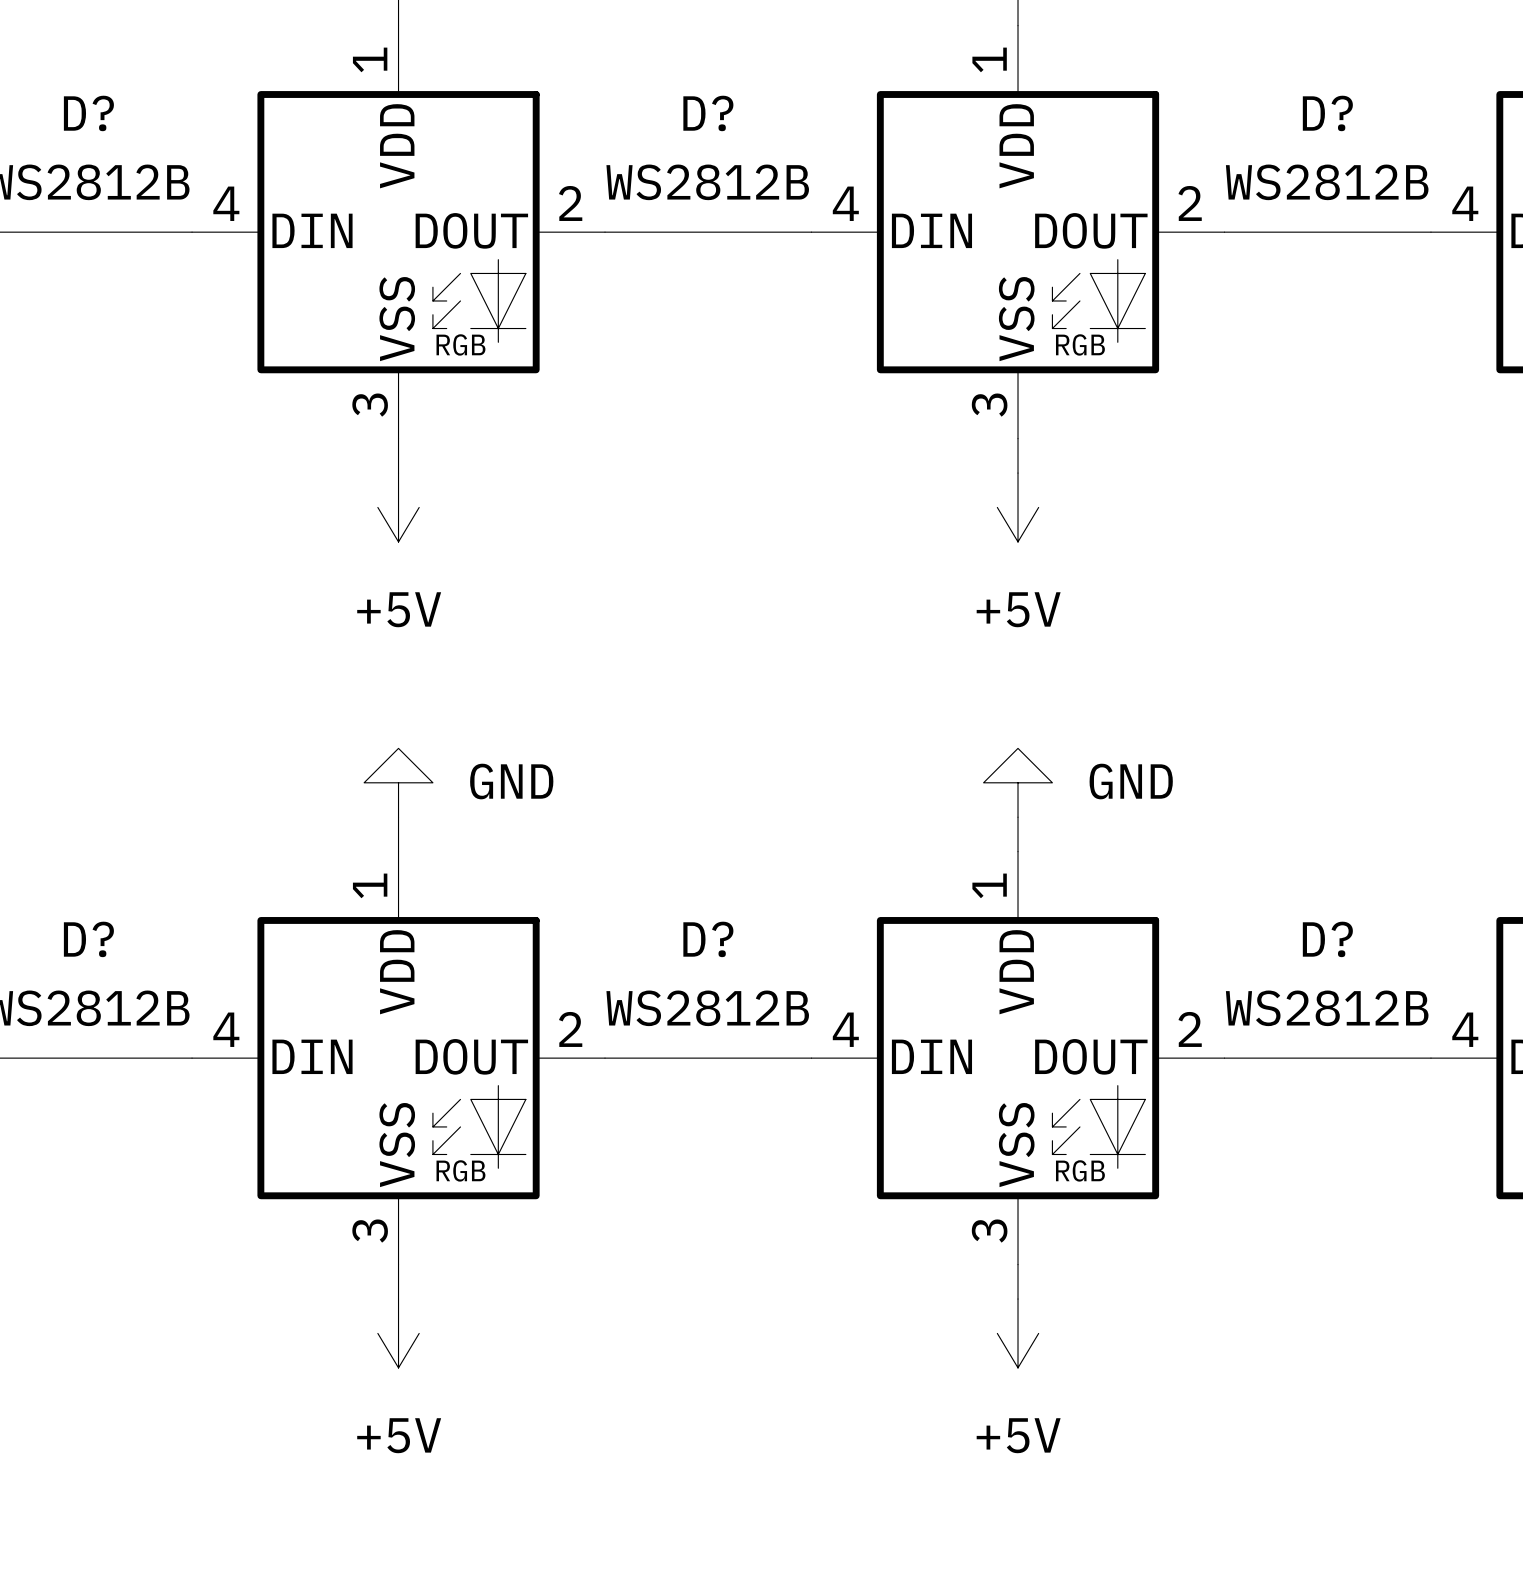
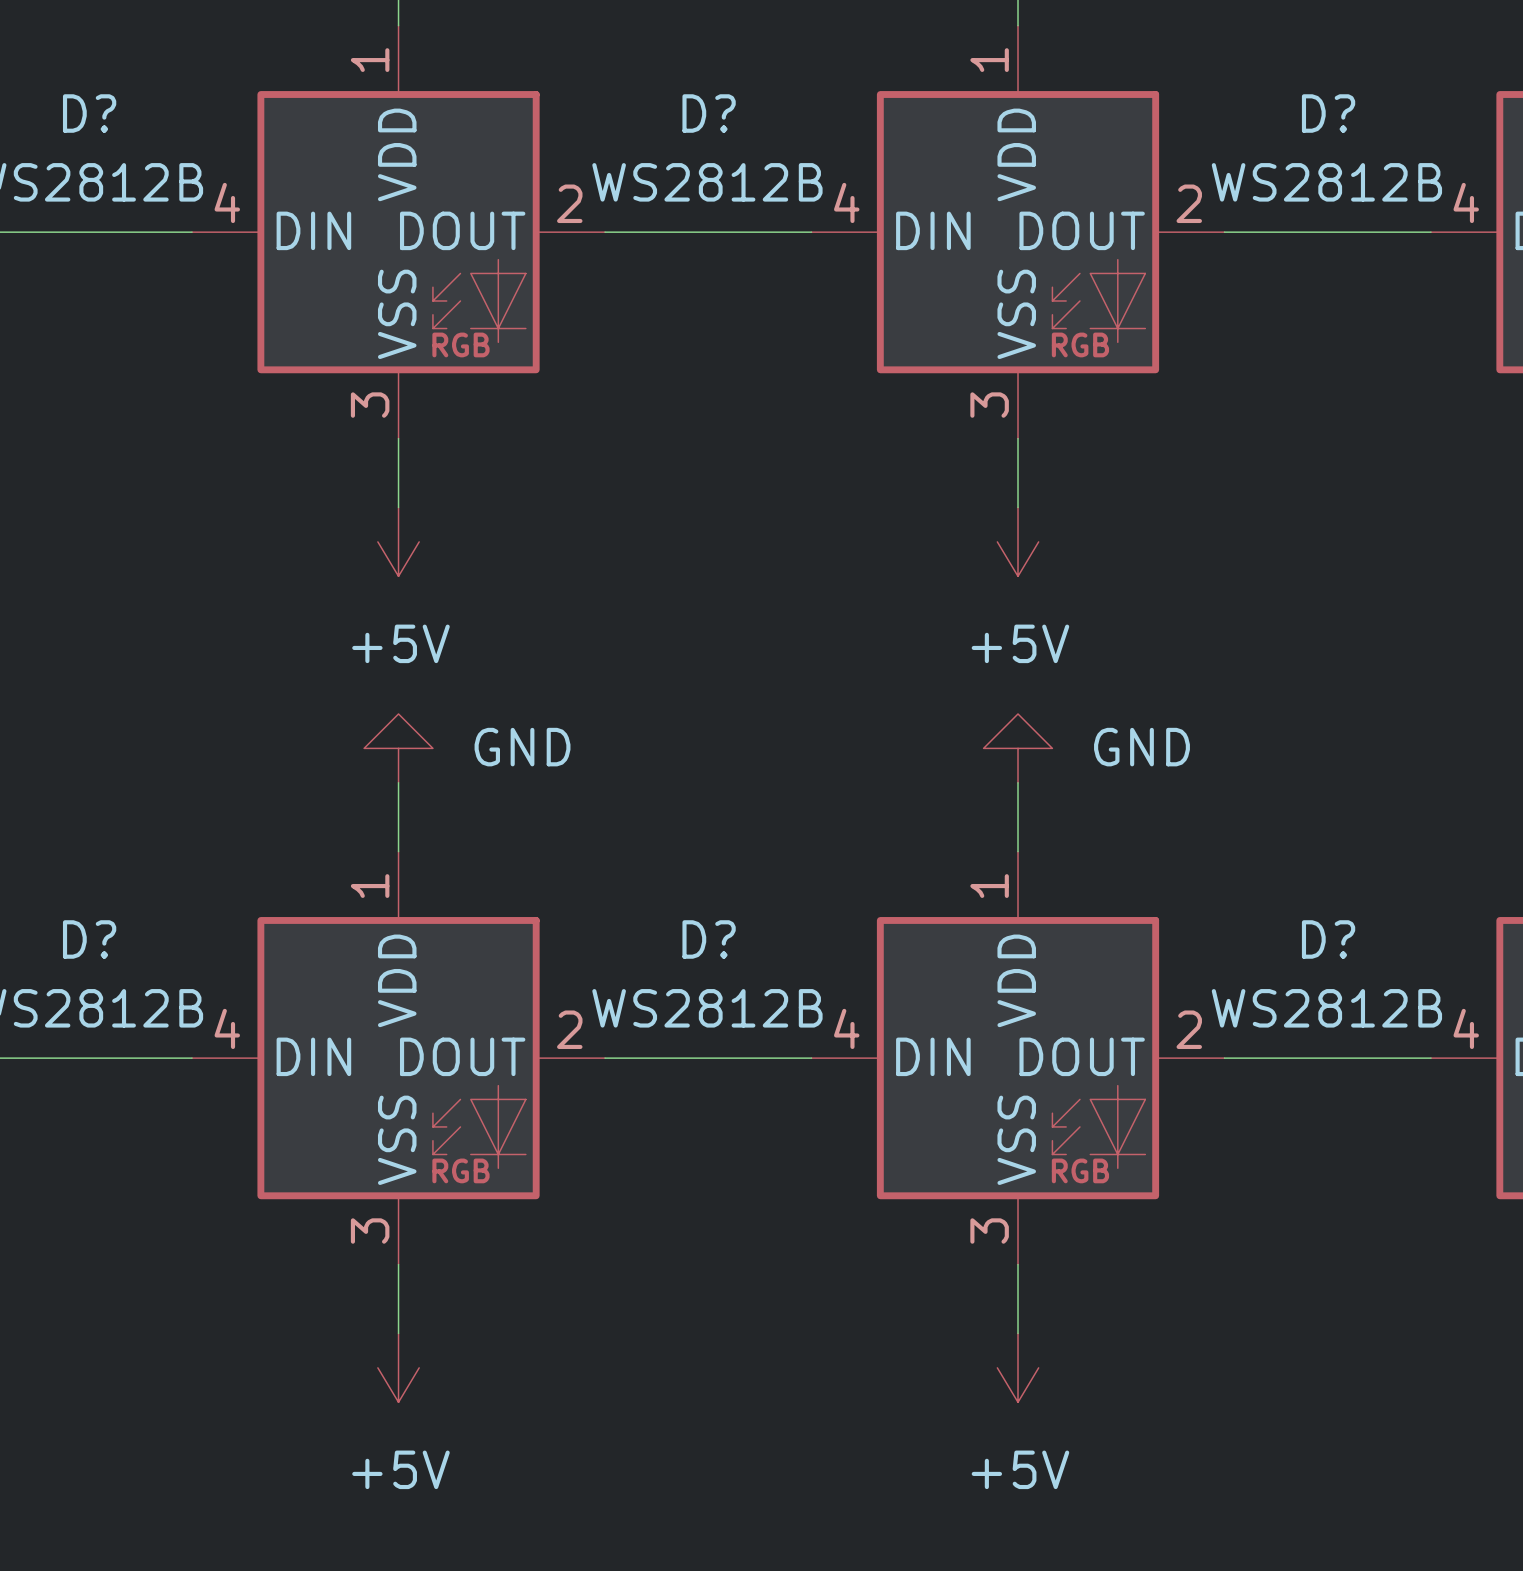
power symbol position: +5V (398, 507) -> +5V (398, 541)
power symbol position: +5V (1018, 507) -> +5V (1018, 541)
power symbol position: GND (398, 782) -> GND (398, 748)
power symbol position: GND (1018, 782) -> GND (1018, 748)
power symbol position: +5V (398, 1333) -> +5V (398, 1367)
power symbol position: +5V (1018, 1333) -> +5V (1018, 1367)

